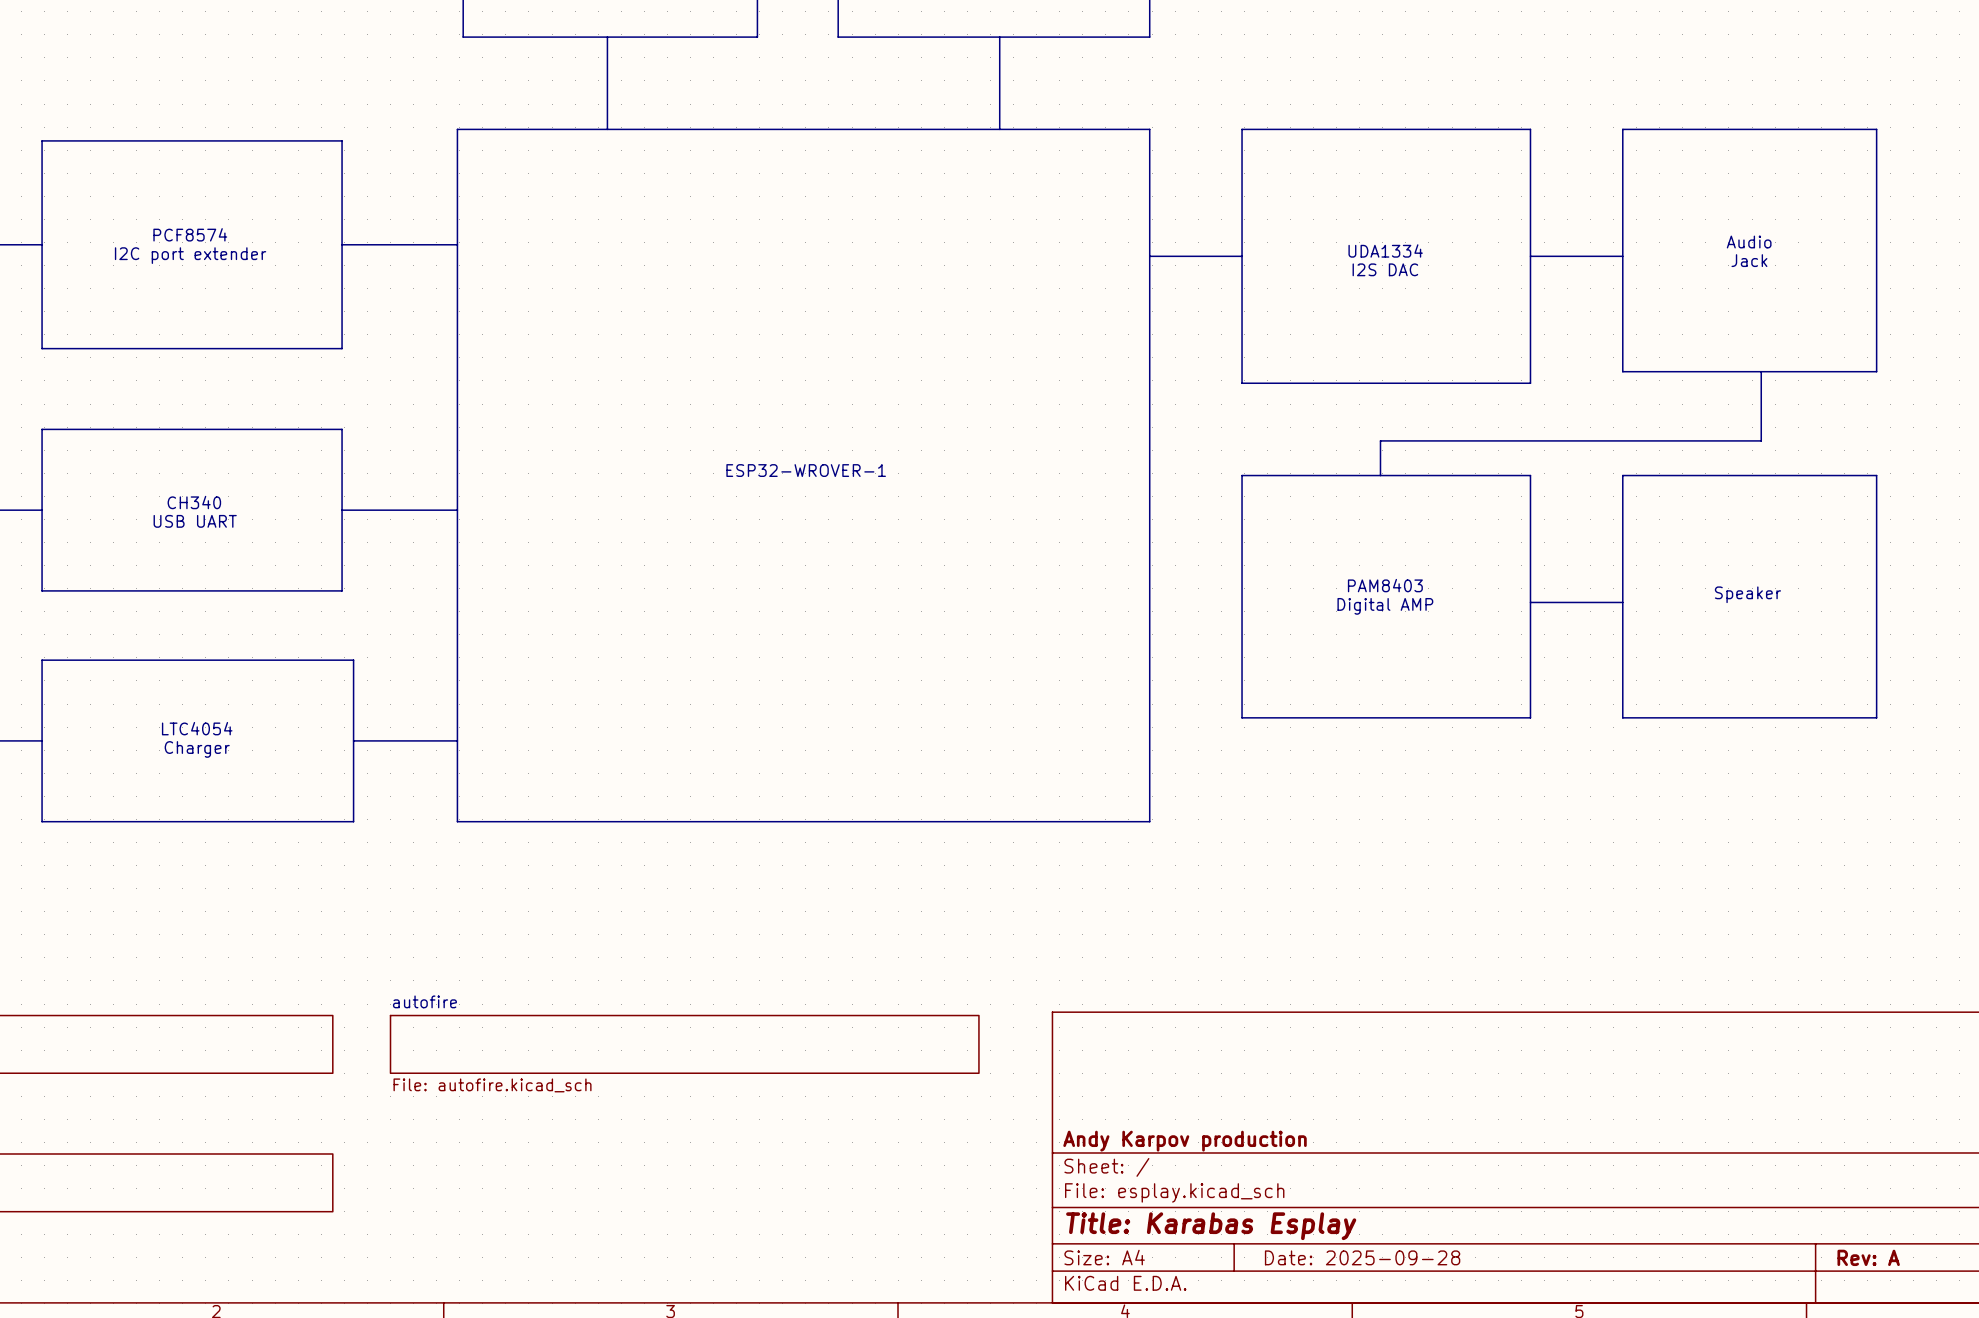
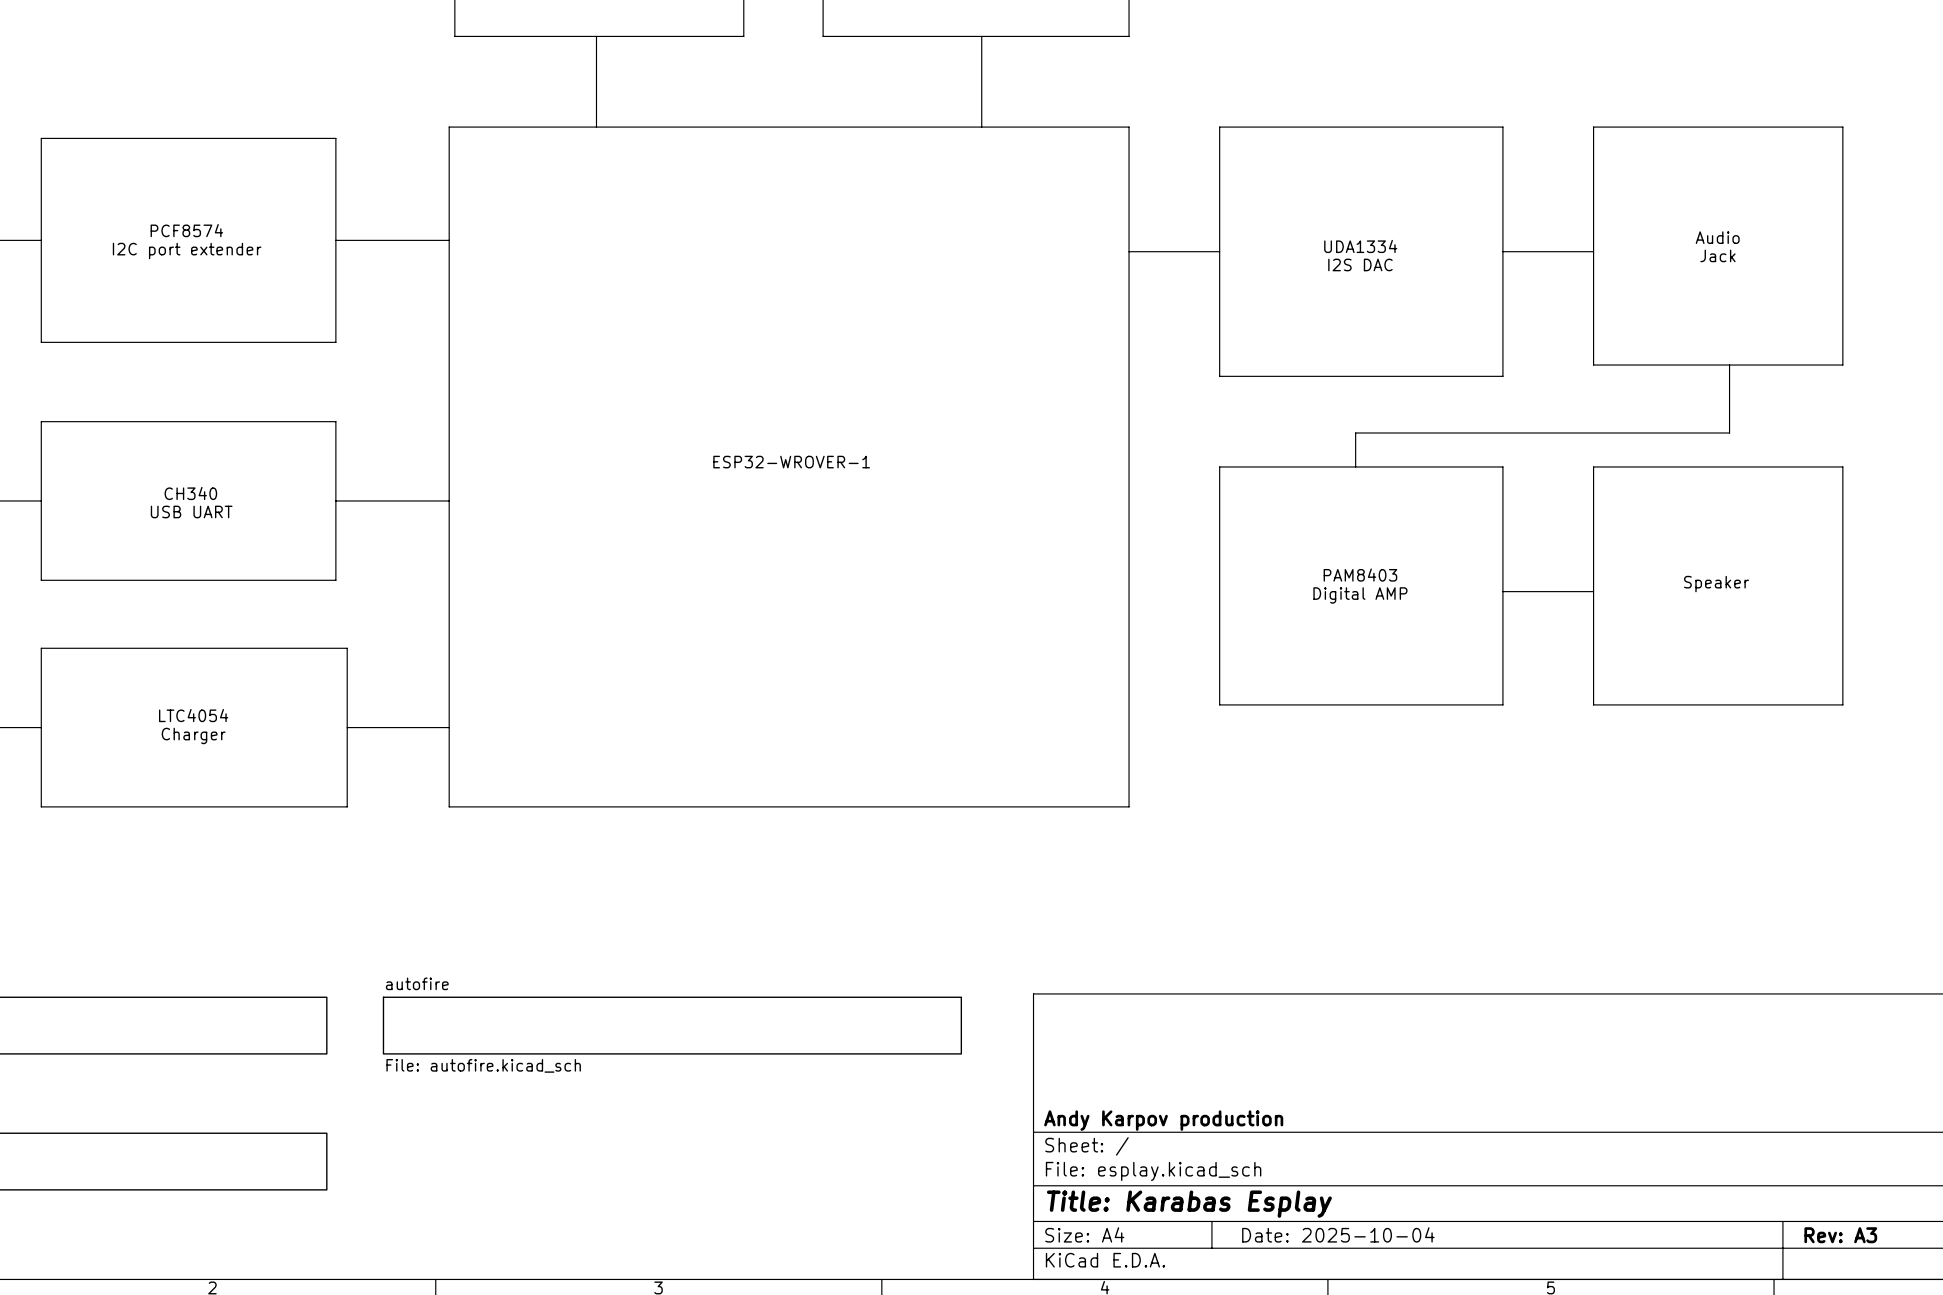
title block: Date: 2025-09-28 (1362, 1257) -> Date: 2025-10-04 (1338, 1234)
title block: Rev: A (1868, 1257) -> Rev: A3 (1840, 1235)

